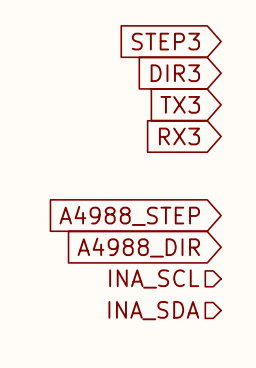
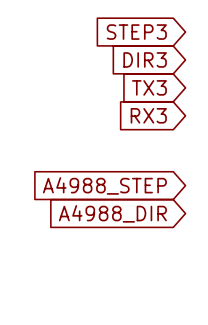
hierarchical label: INA_SCL (154, 278) -> none
hierarchical label: INA_SDA (153, 310) -> none

